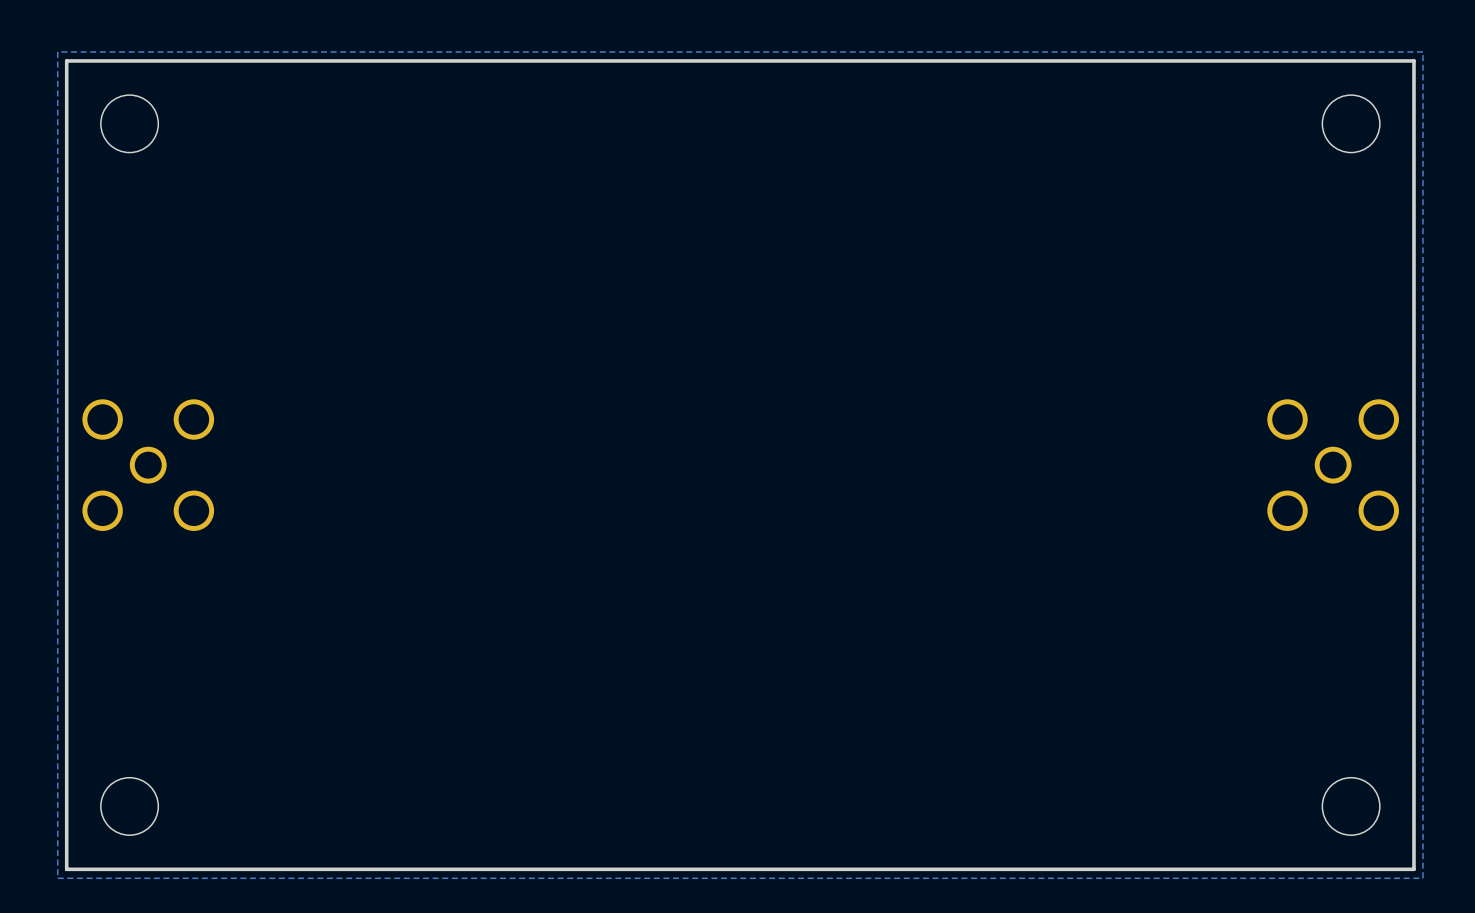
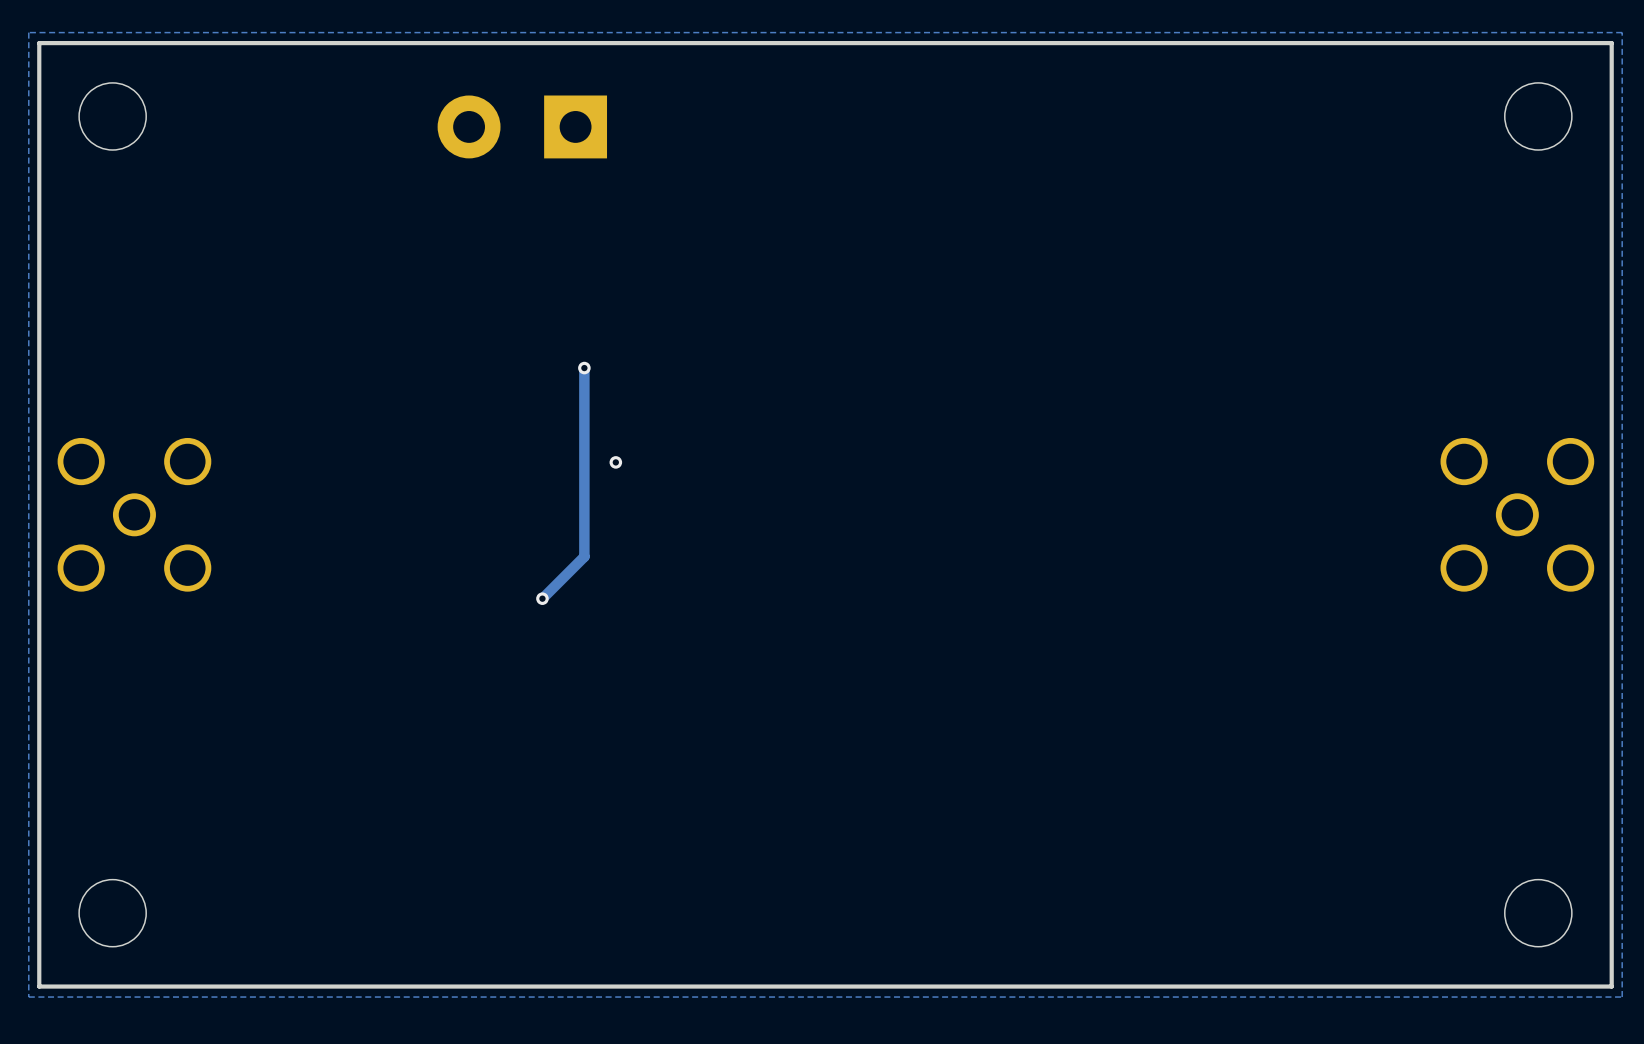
part: none -> (522, 126)
track: none -> (584, 368) (584, 556) (542, 598)
via: none -> (584, 368)
via: none -> (615, 462)
via: none -> (542, 598)

